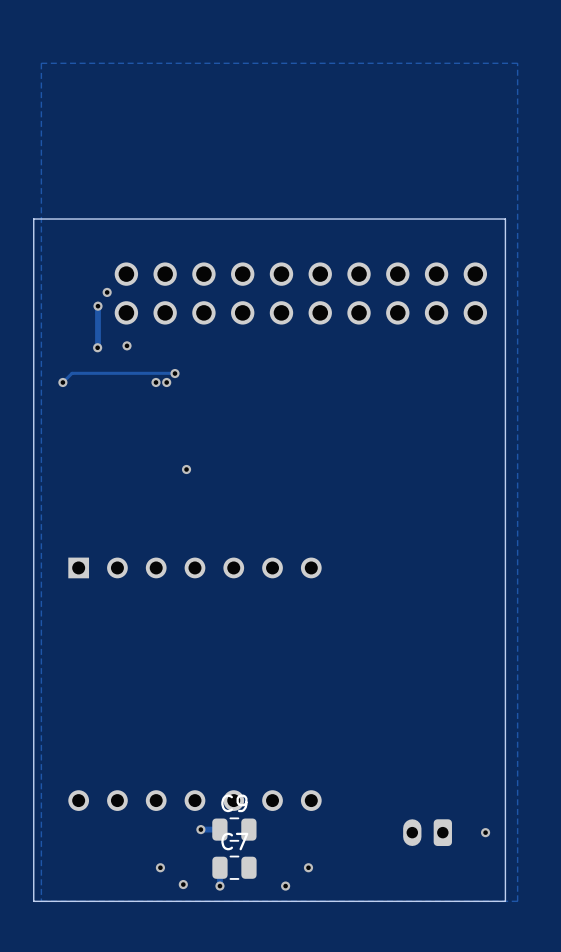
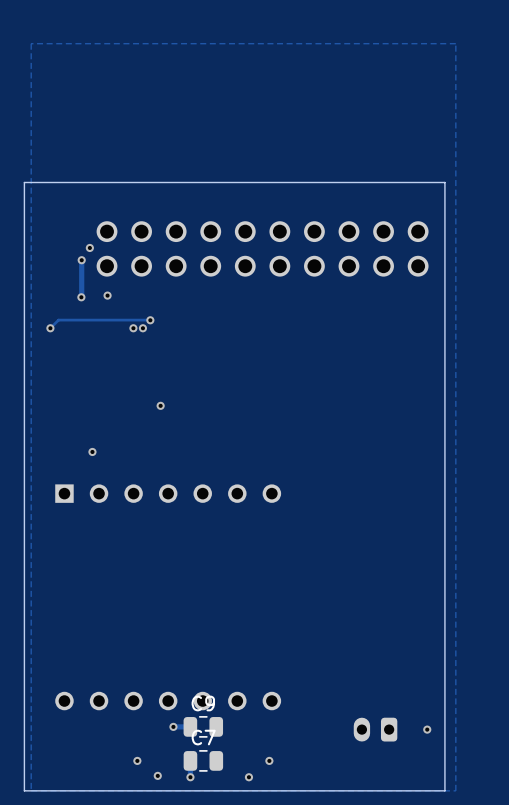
via: none -> (92, 451)

